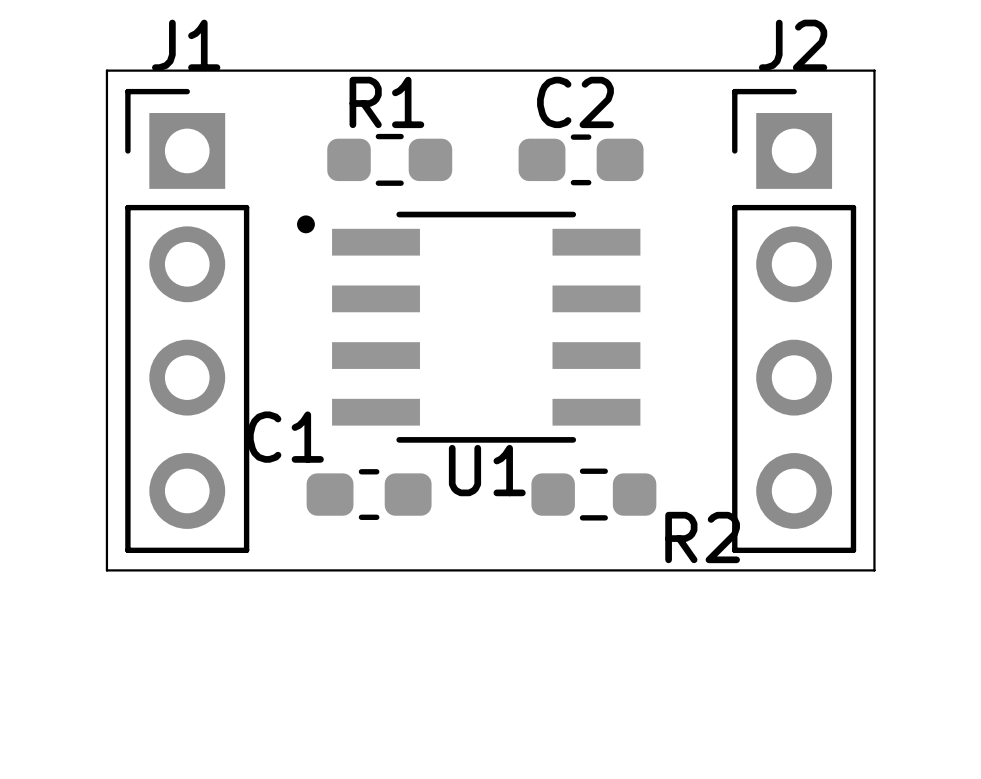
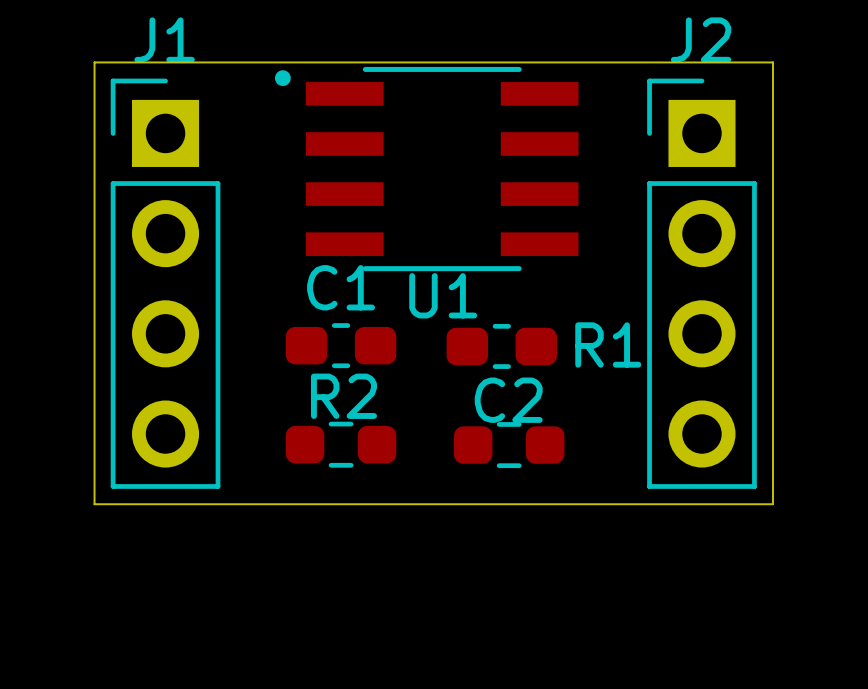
R1 name position: R1 (386, 102) -> R1 (608, 344)
C2 name position: C2 (575, 102) -> C2 (508, 400)
R1 position: (389, 159) -> (509, 445)
C2 position: (581, 159) -> (501, 346)
U1 position: (468, 327) -> (426, 169)
C1 name position: C1 (285, 437) -> C1 (341, 287)
C1 position: (369, 494) -> (341, 345)
R2 position: (593, 494) -> (341, 444)
R2 name position: R2 (702, 537) -> R2 (343, 396)

